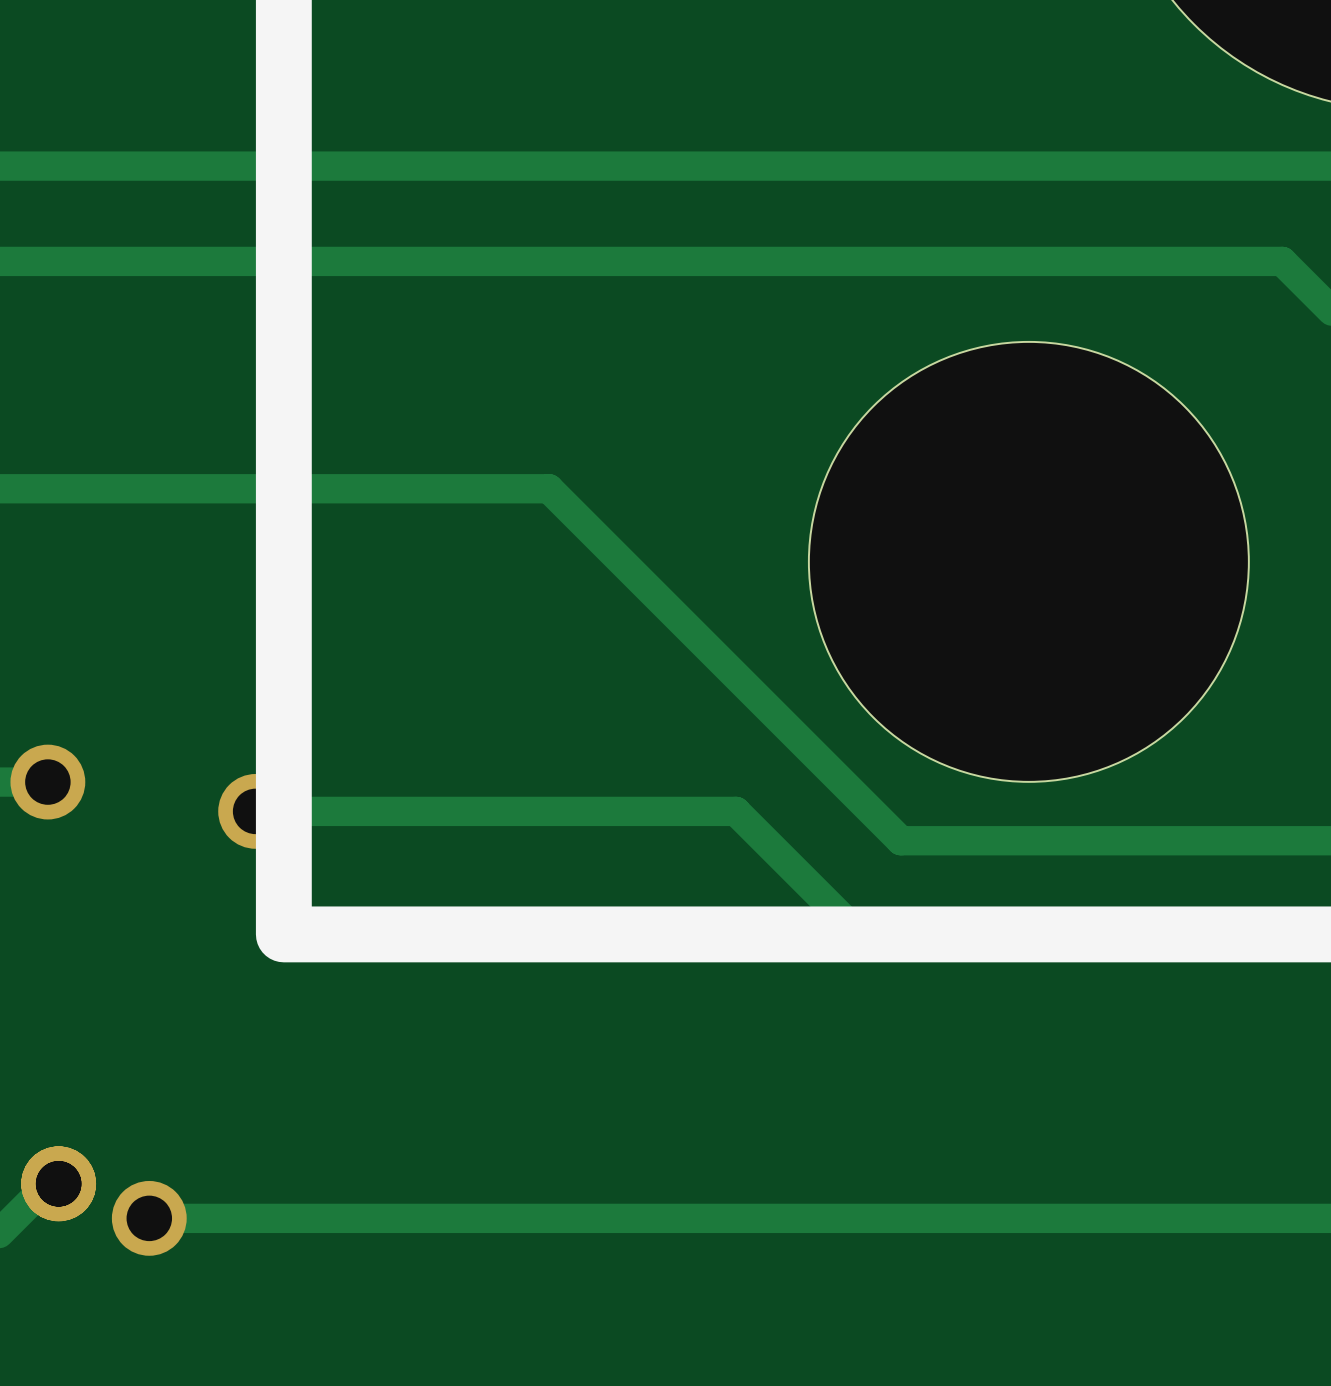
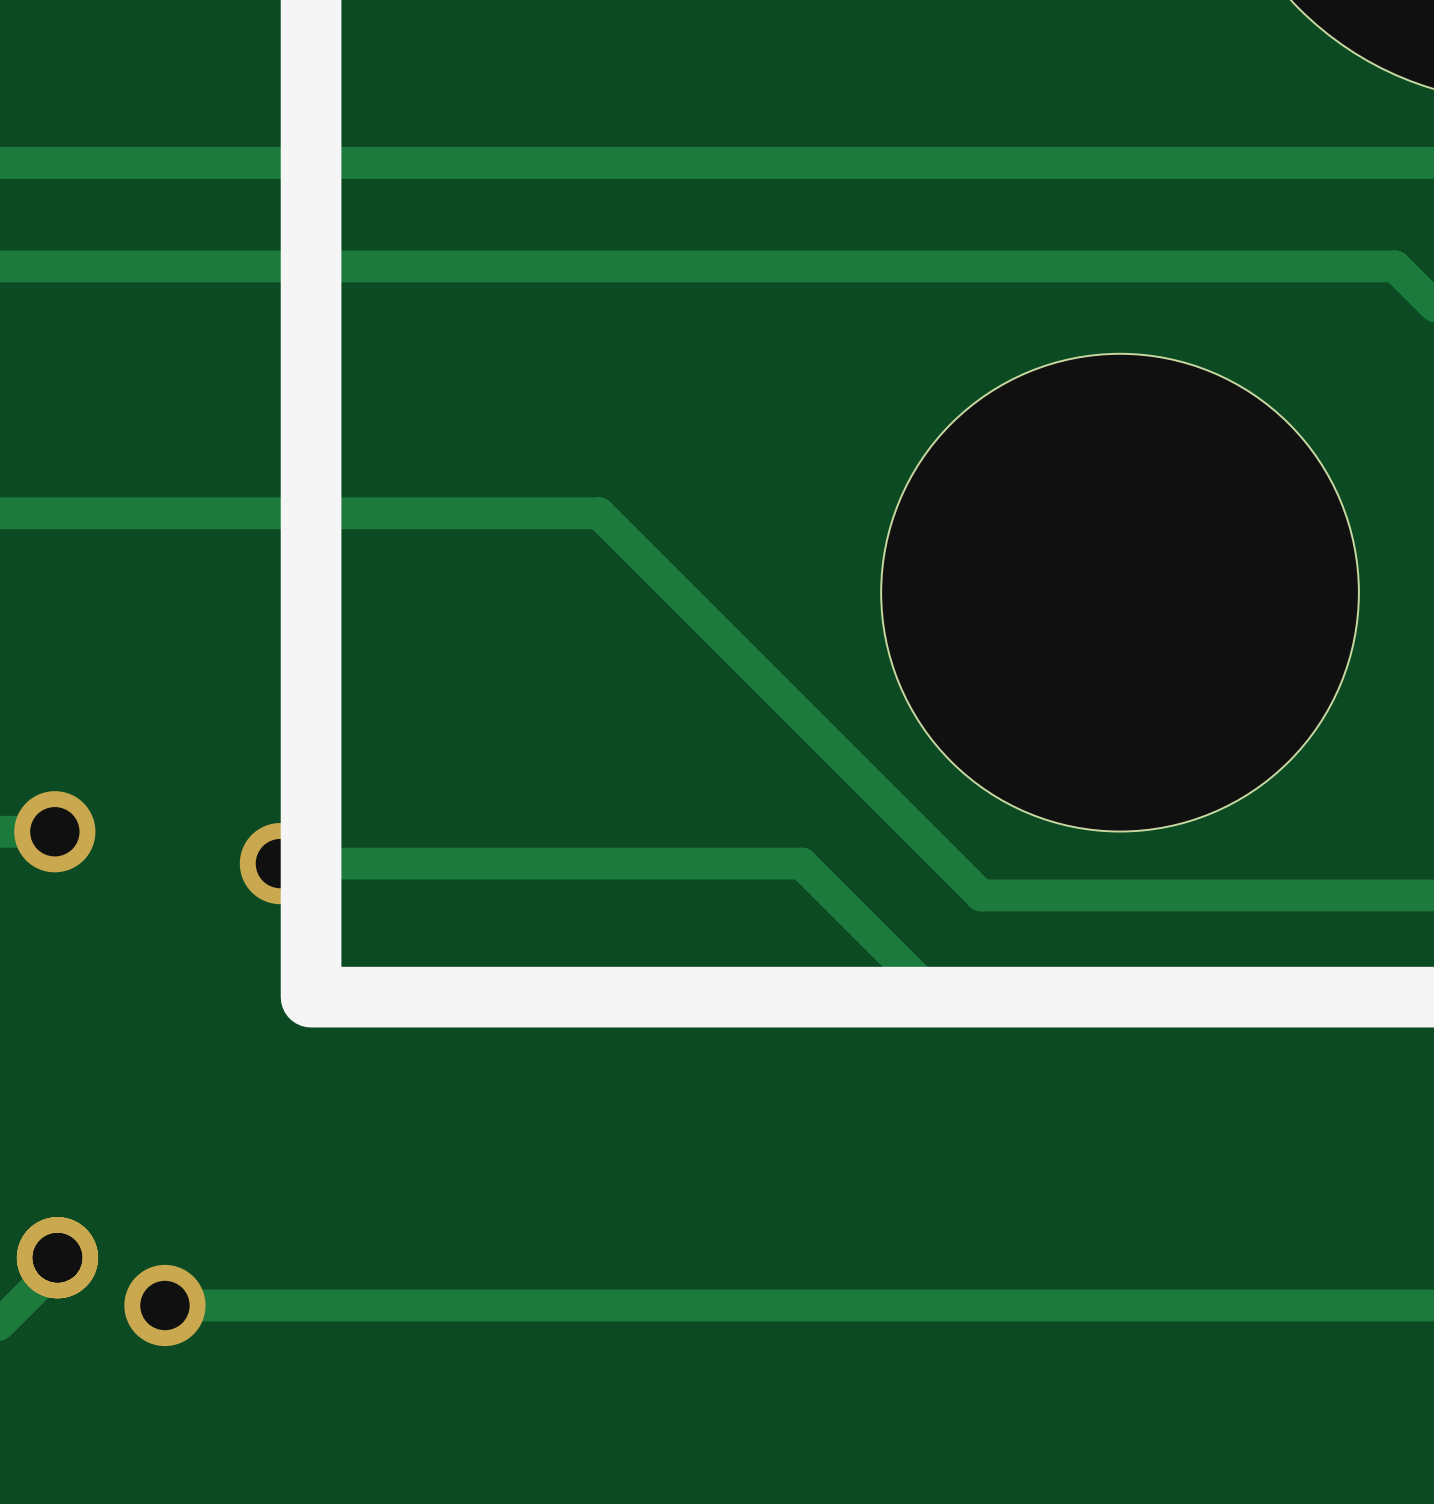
via position: (58, 1183) -> (57, 1257)

